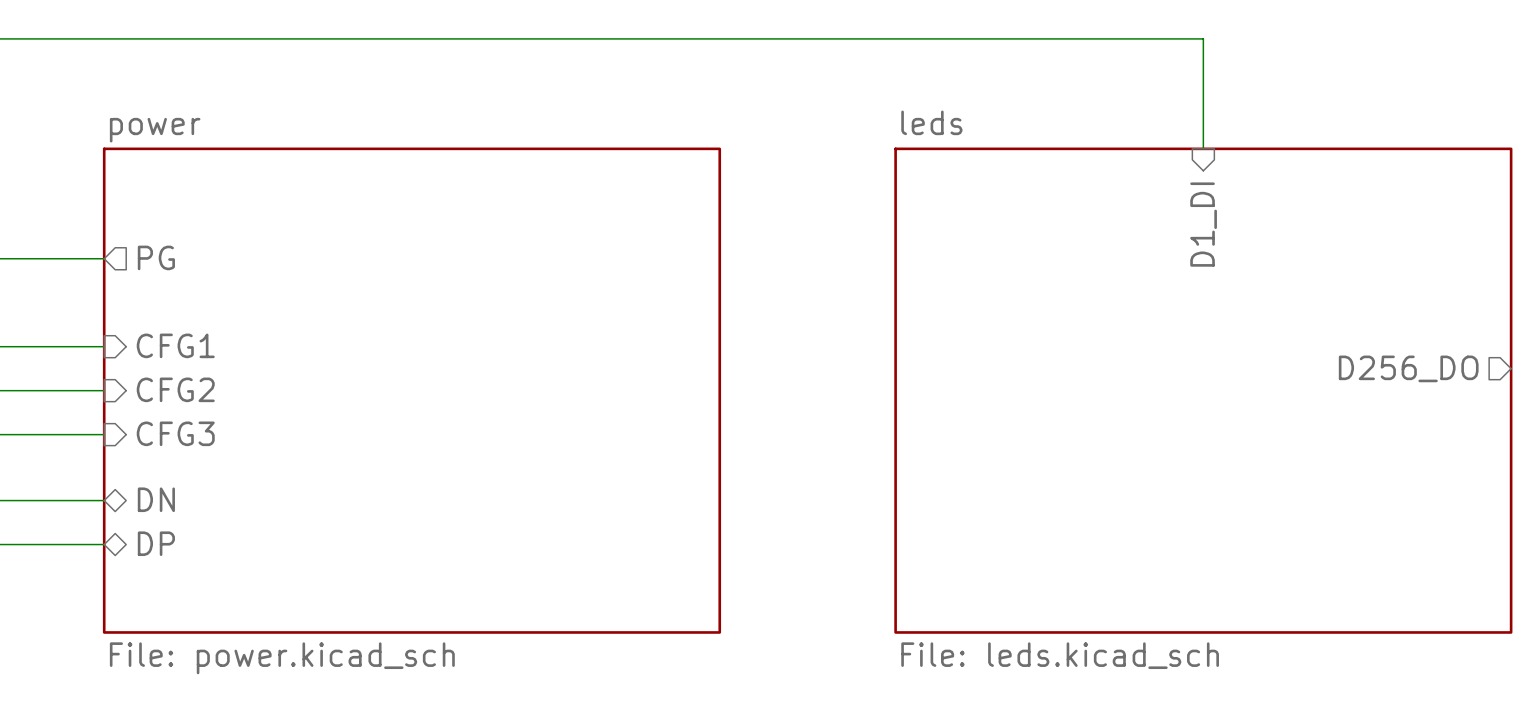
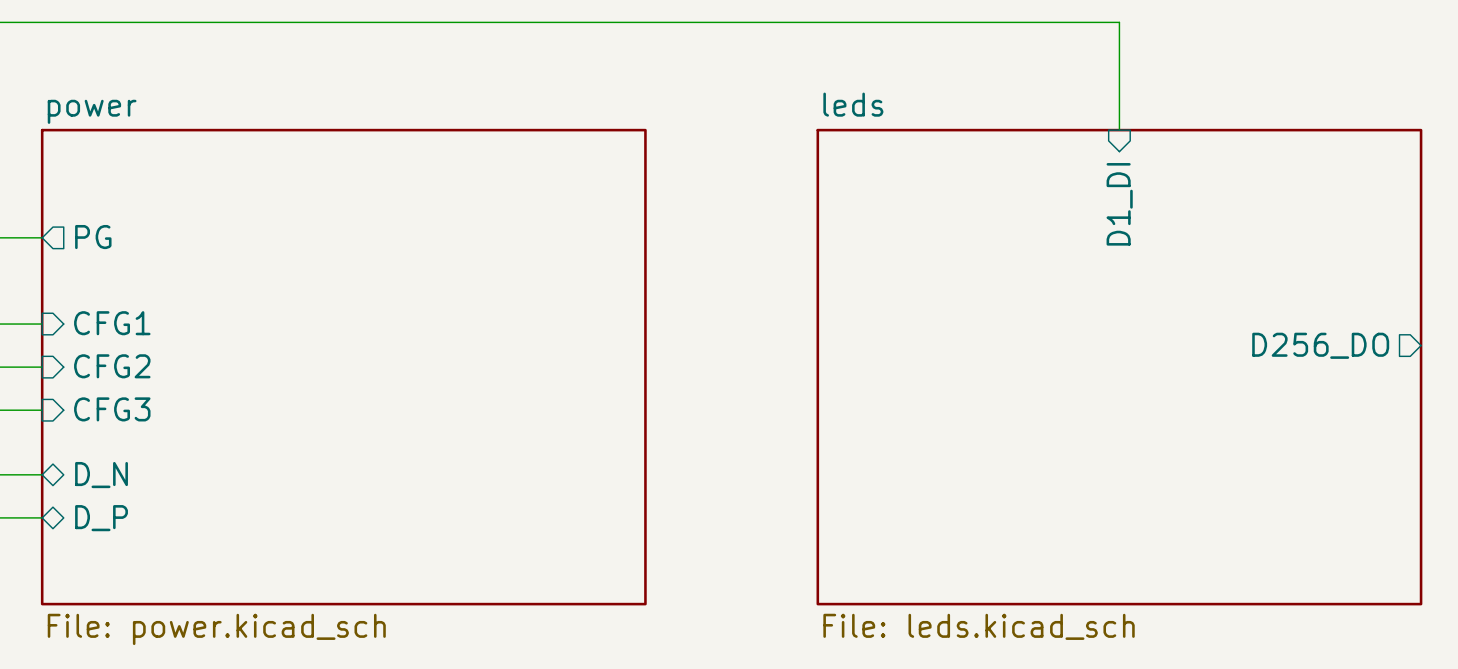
sheet pin: DN (156, 499) -> D_N (101, 475)
sheet pin: DP (156, 543) -> D_P (101, 518)

